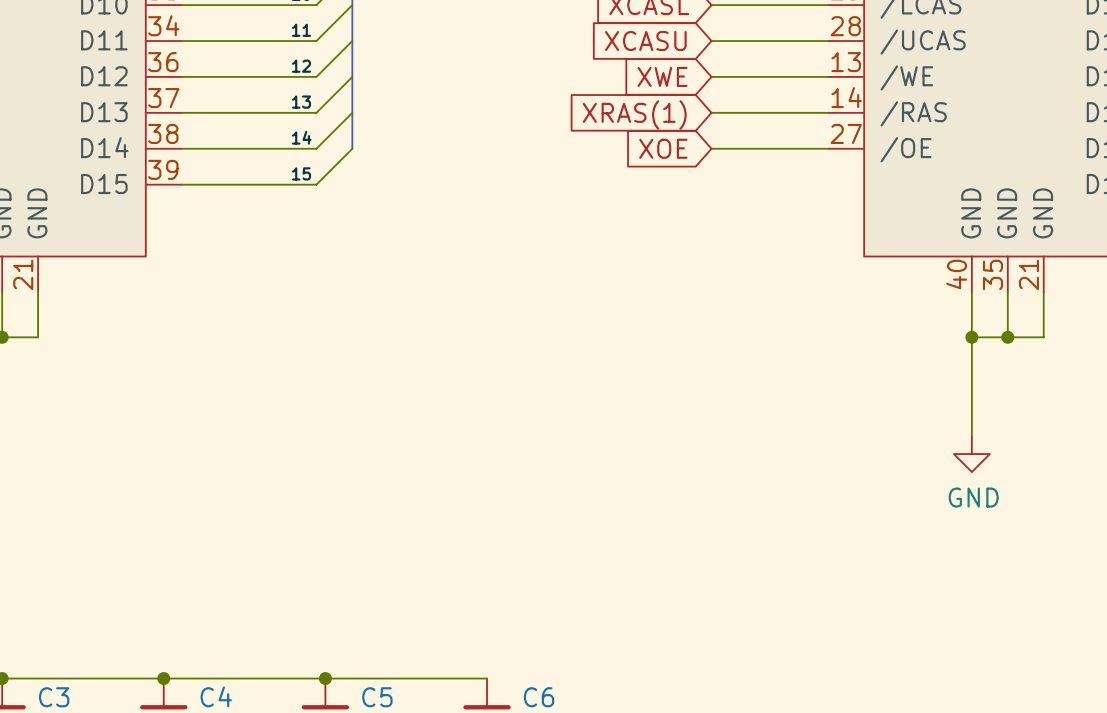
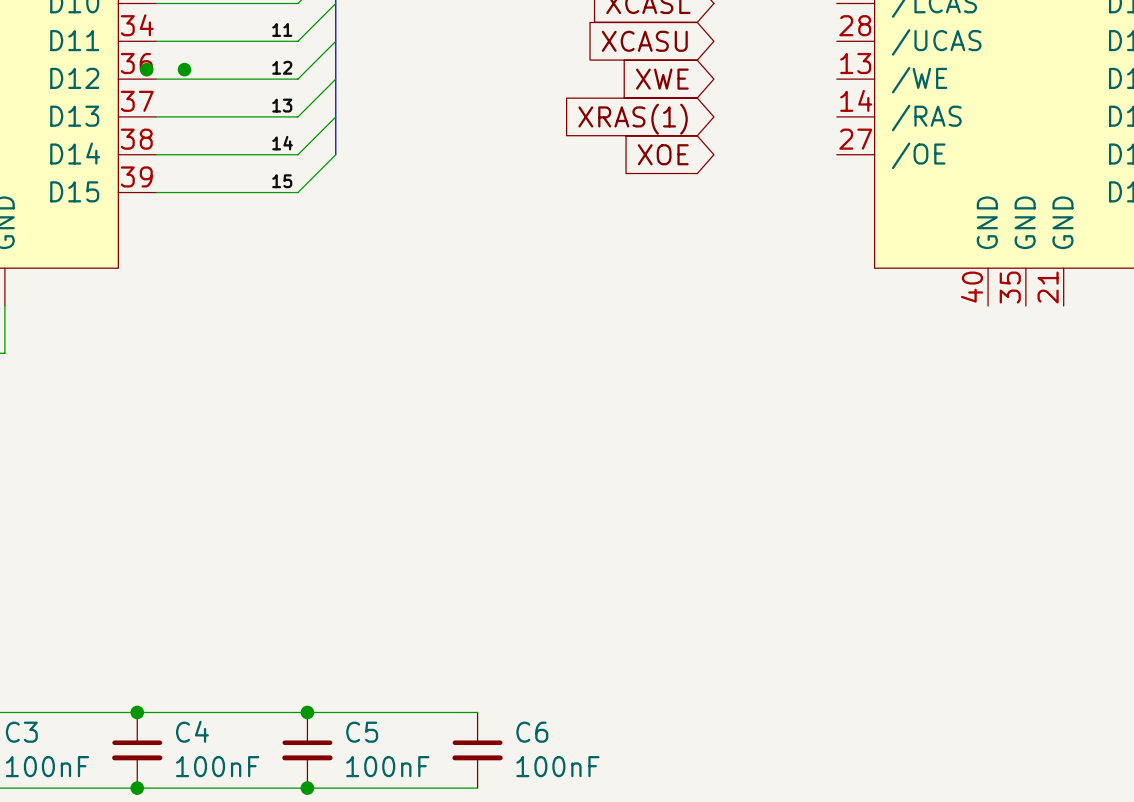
wire: (711, 5) (828, 5) -> none
wire: (711, 41) (828, 41) -> none
junction: none -> (146, 69)
junction: none -> (184, 69)
wire: (711, 76) (828, 76) -> none
wire: (711, 112) (828, 112) -> none
wire: (711, 148) (828, 148) -> none
wire: (971, 292) (971, 436) -> none
wire: (1007, 292) (1007, 337) -> none
wire: (1043, 292) (1043, 337) (971, 337) -> none
junction: (971, 337) -> none
junction: (1007, 337) -> none
power symbol: GND (971, 454) -> none

